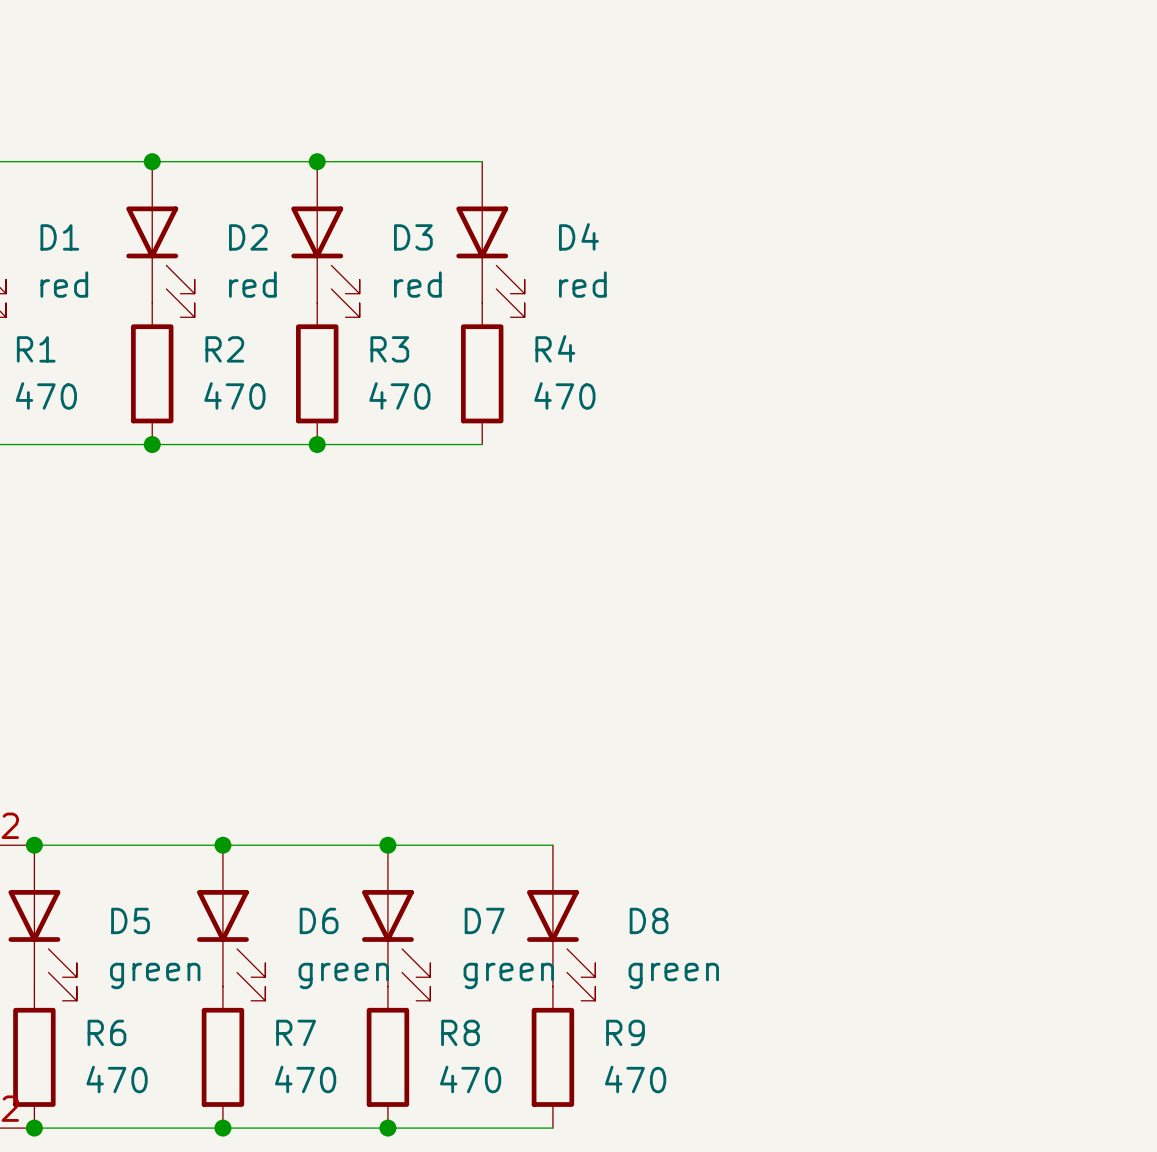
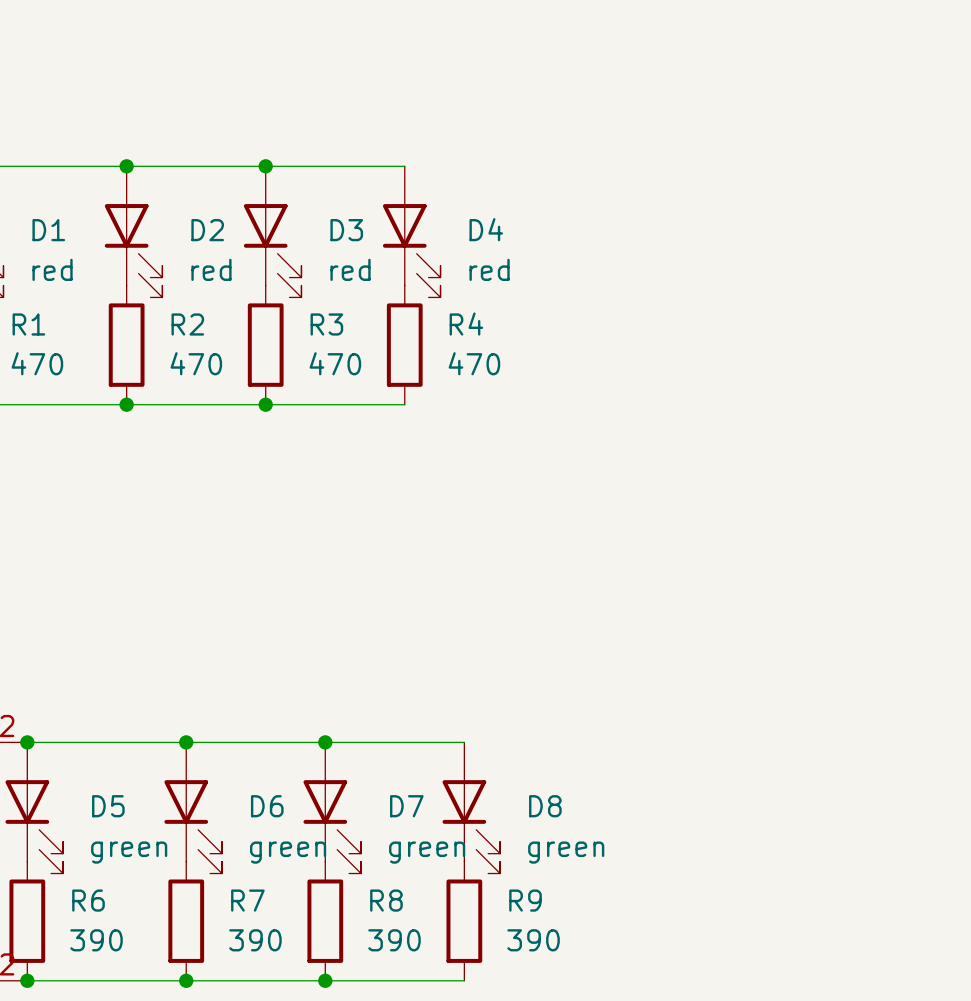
R6 value: 470 (117, 1079) -> 390 (96, 940)
R7 value: 470 (305, 1079) -> 390 (255, 940)
R8 value: 470 (470, 1079) -> 390 (394, 940)
R9 value: 470 (635, 1079) -> 390 (533, 940)

